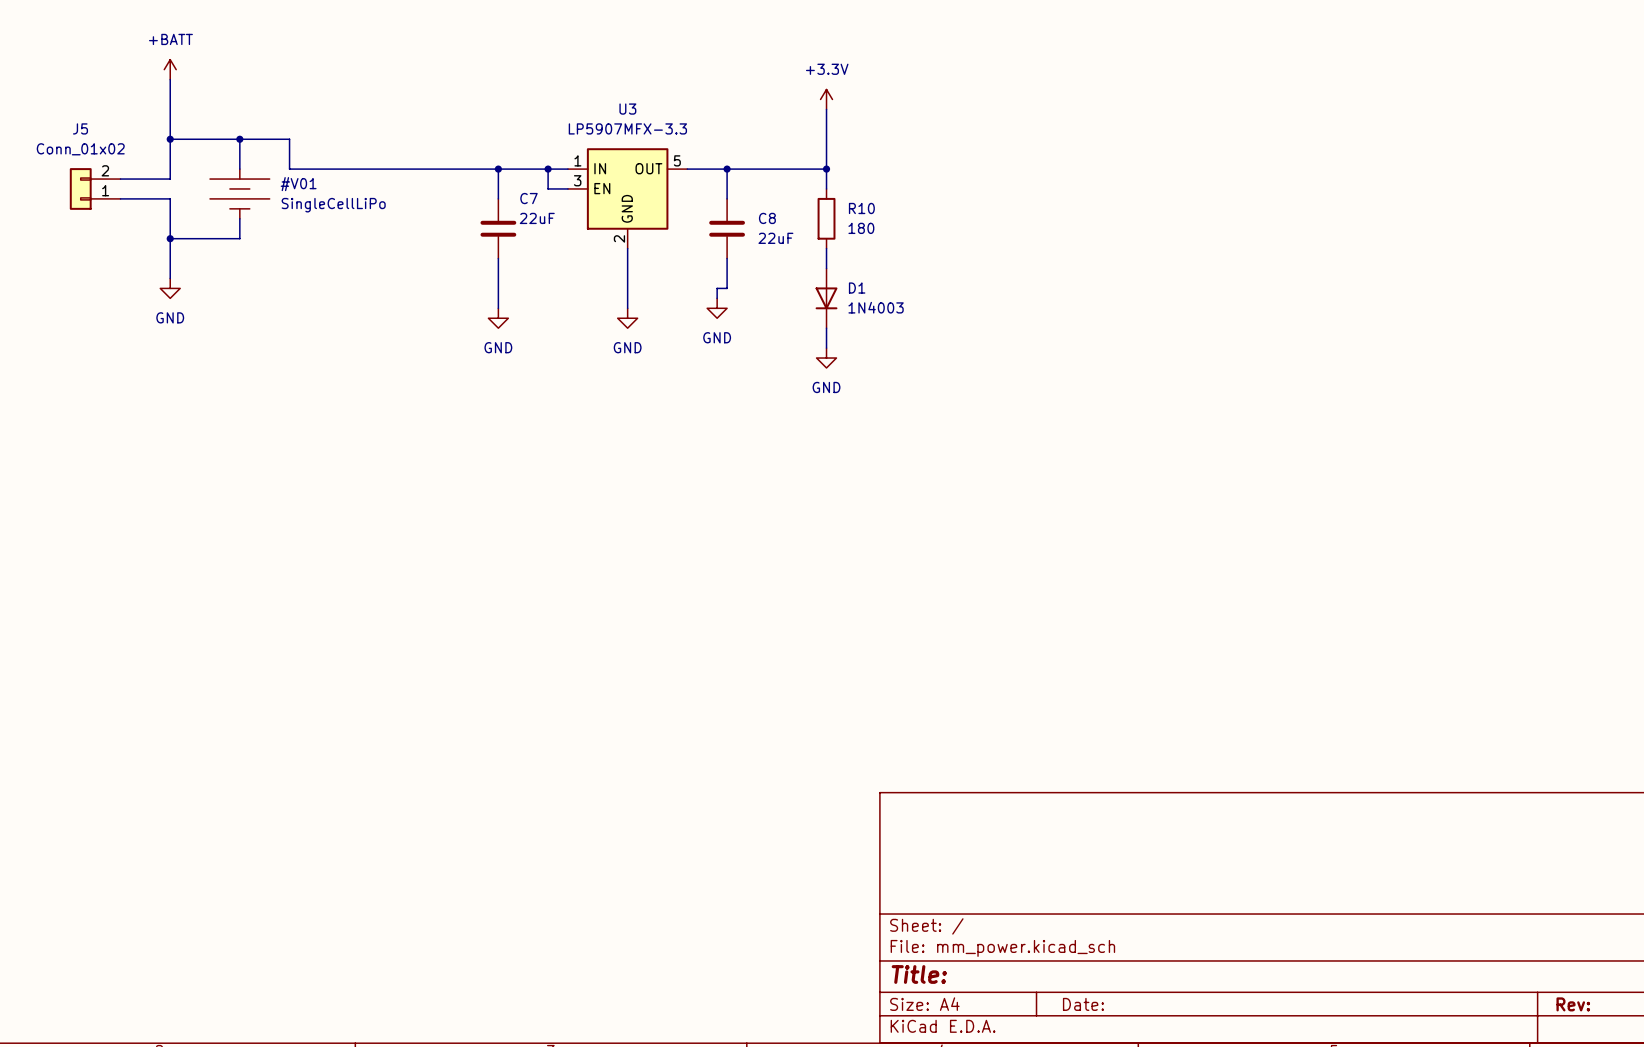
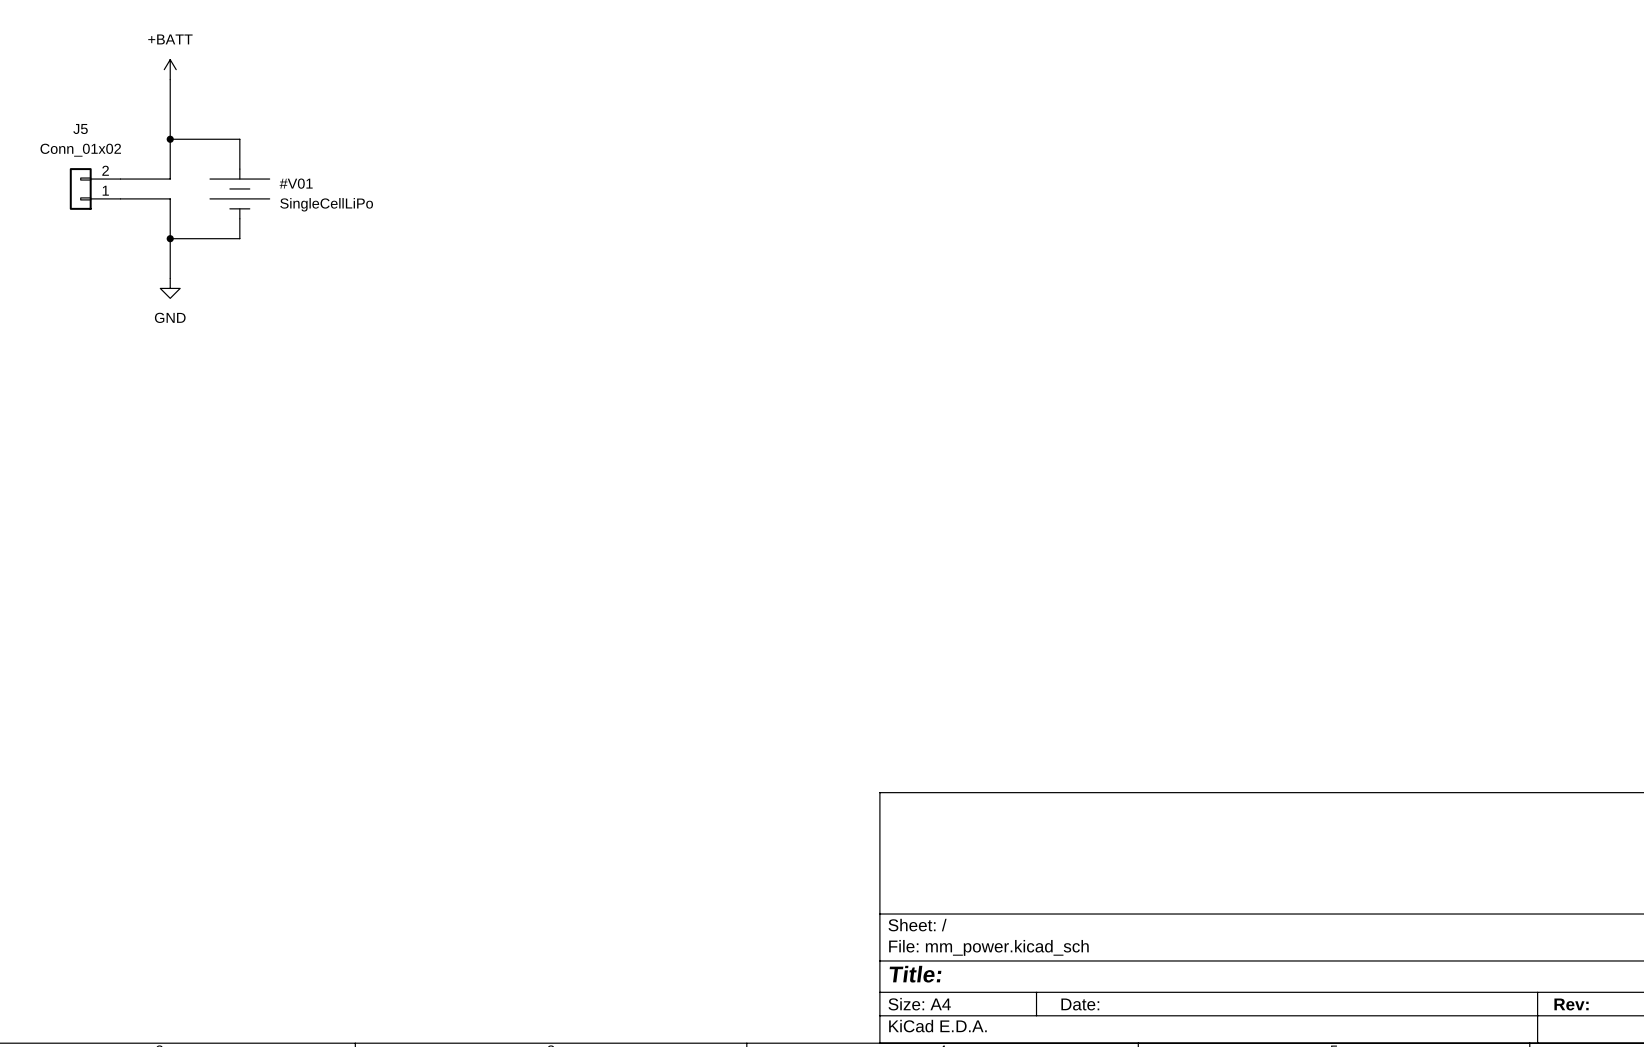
power symbol: +3.3V (826, 99) -> none
wire: (826, 109) (826, 188) -> none
wire: (239, 139) (289, 139) (289, 169) (567, 169) -> none
junction: (239, 139) -> none
wire: (498, 169) (498, 198) -> none
junction: (498, 169) -> none
wire: (548, 169) (548, 188) (567, 188) -> none
junction: (548, 169) -> none
wire: (687, 169) (826, 169) -> none
wire: (727, 169) (727, 198) -> none
junction: (727, 169) -> none
junction: (826, 169) -> none
U3: LP5907MFX-3.3 (627, 198) -> none
R10: 180 (826, 218) -> none
C7: 22uF (498, 228) -> none
C8: 22uF (727, 228) -> none
wire: (627, 248) (627, 308) -> none
wire: (826, 248) (826, 268) -> none
wire: (498, 258) (498, 308) -> none
wire: (727, 258) (727, 288) (717, 288) (717, 298) -> none
D1: 1N4003 (826, 298) -> none
power symbol: GND (717, 308) -> none
power symbol: GND (498, 318) -> none
power symbol: GND (627, 318) -> none
wire: (826, 328) (826, 348) -> none
power symbol: GND (826, 358) -> none

